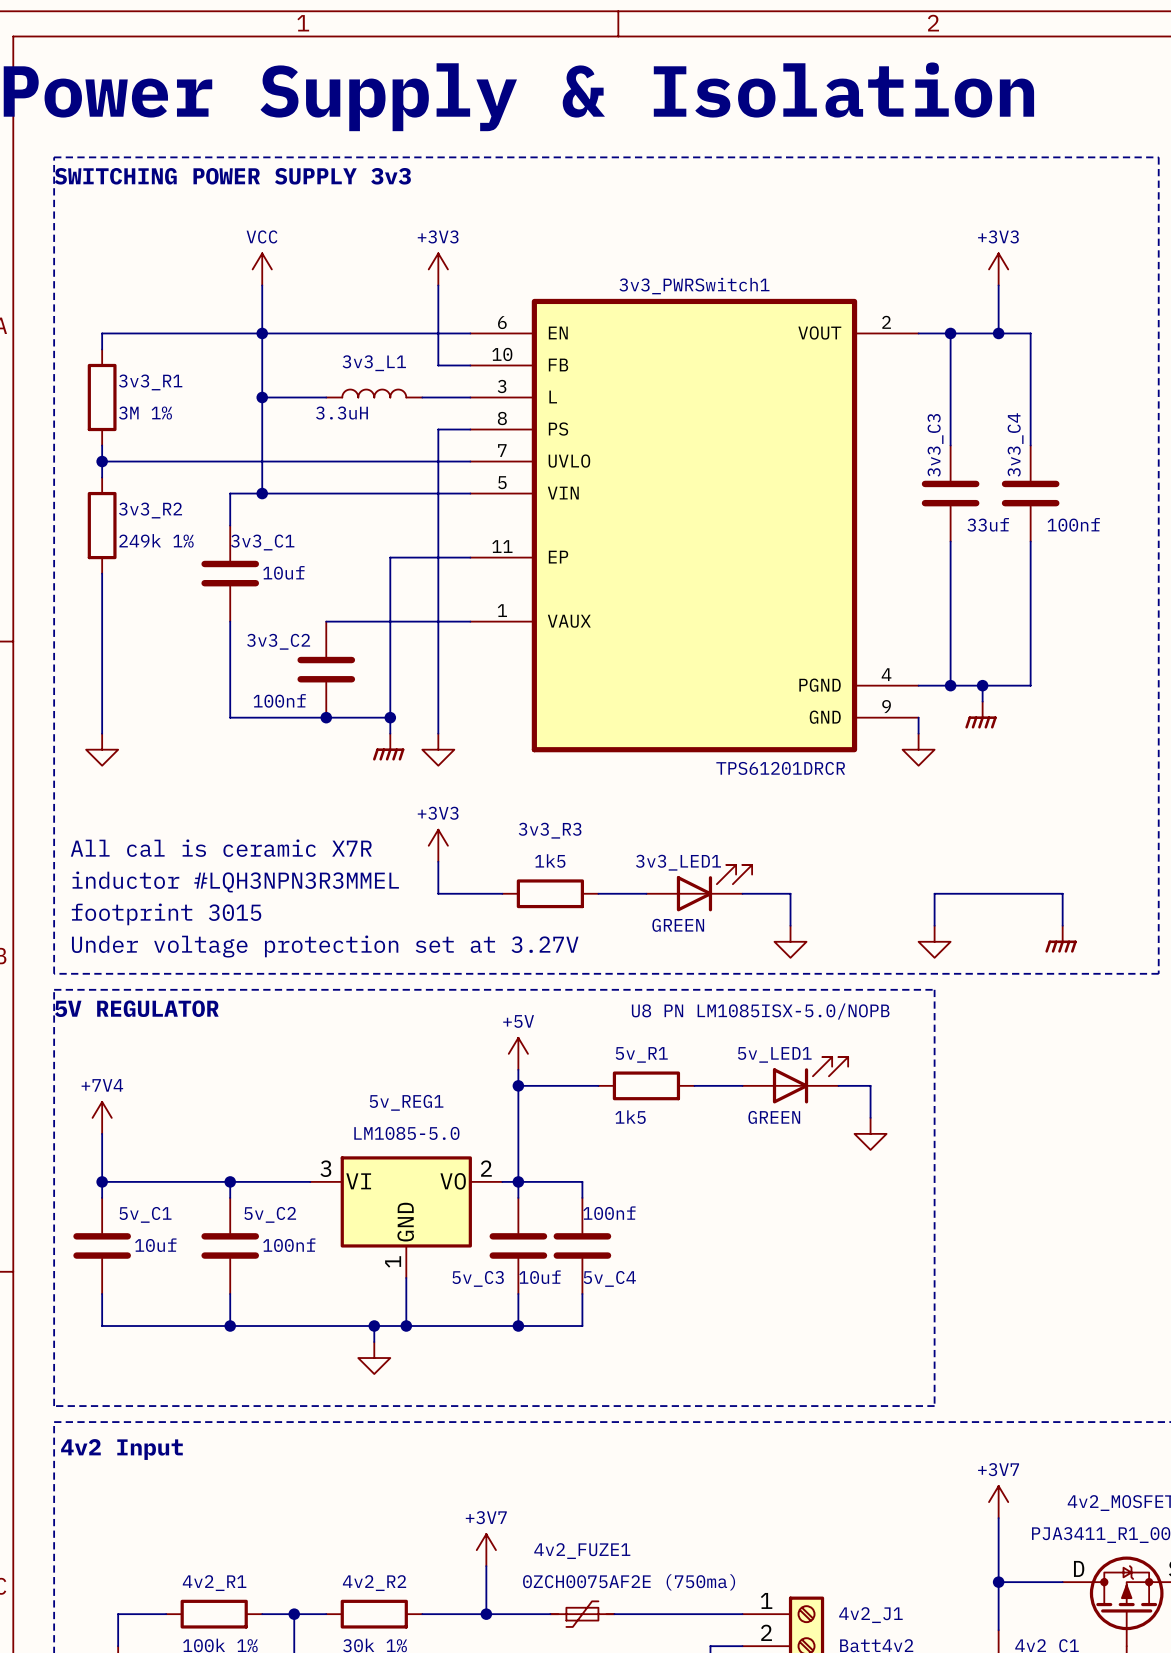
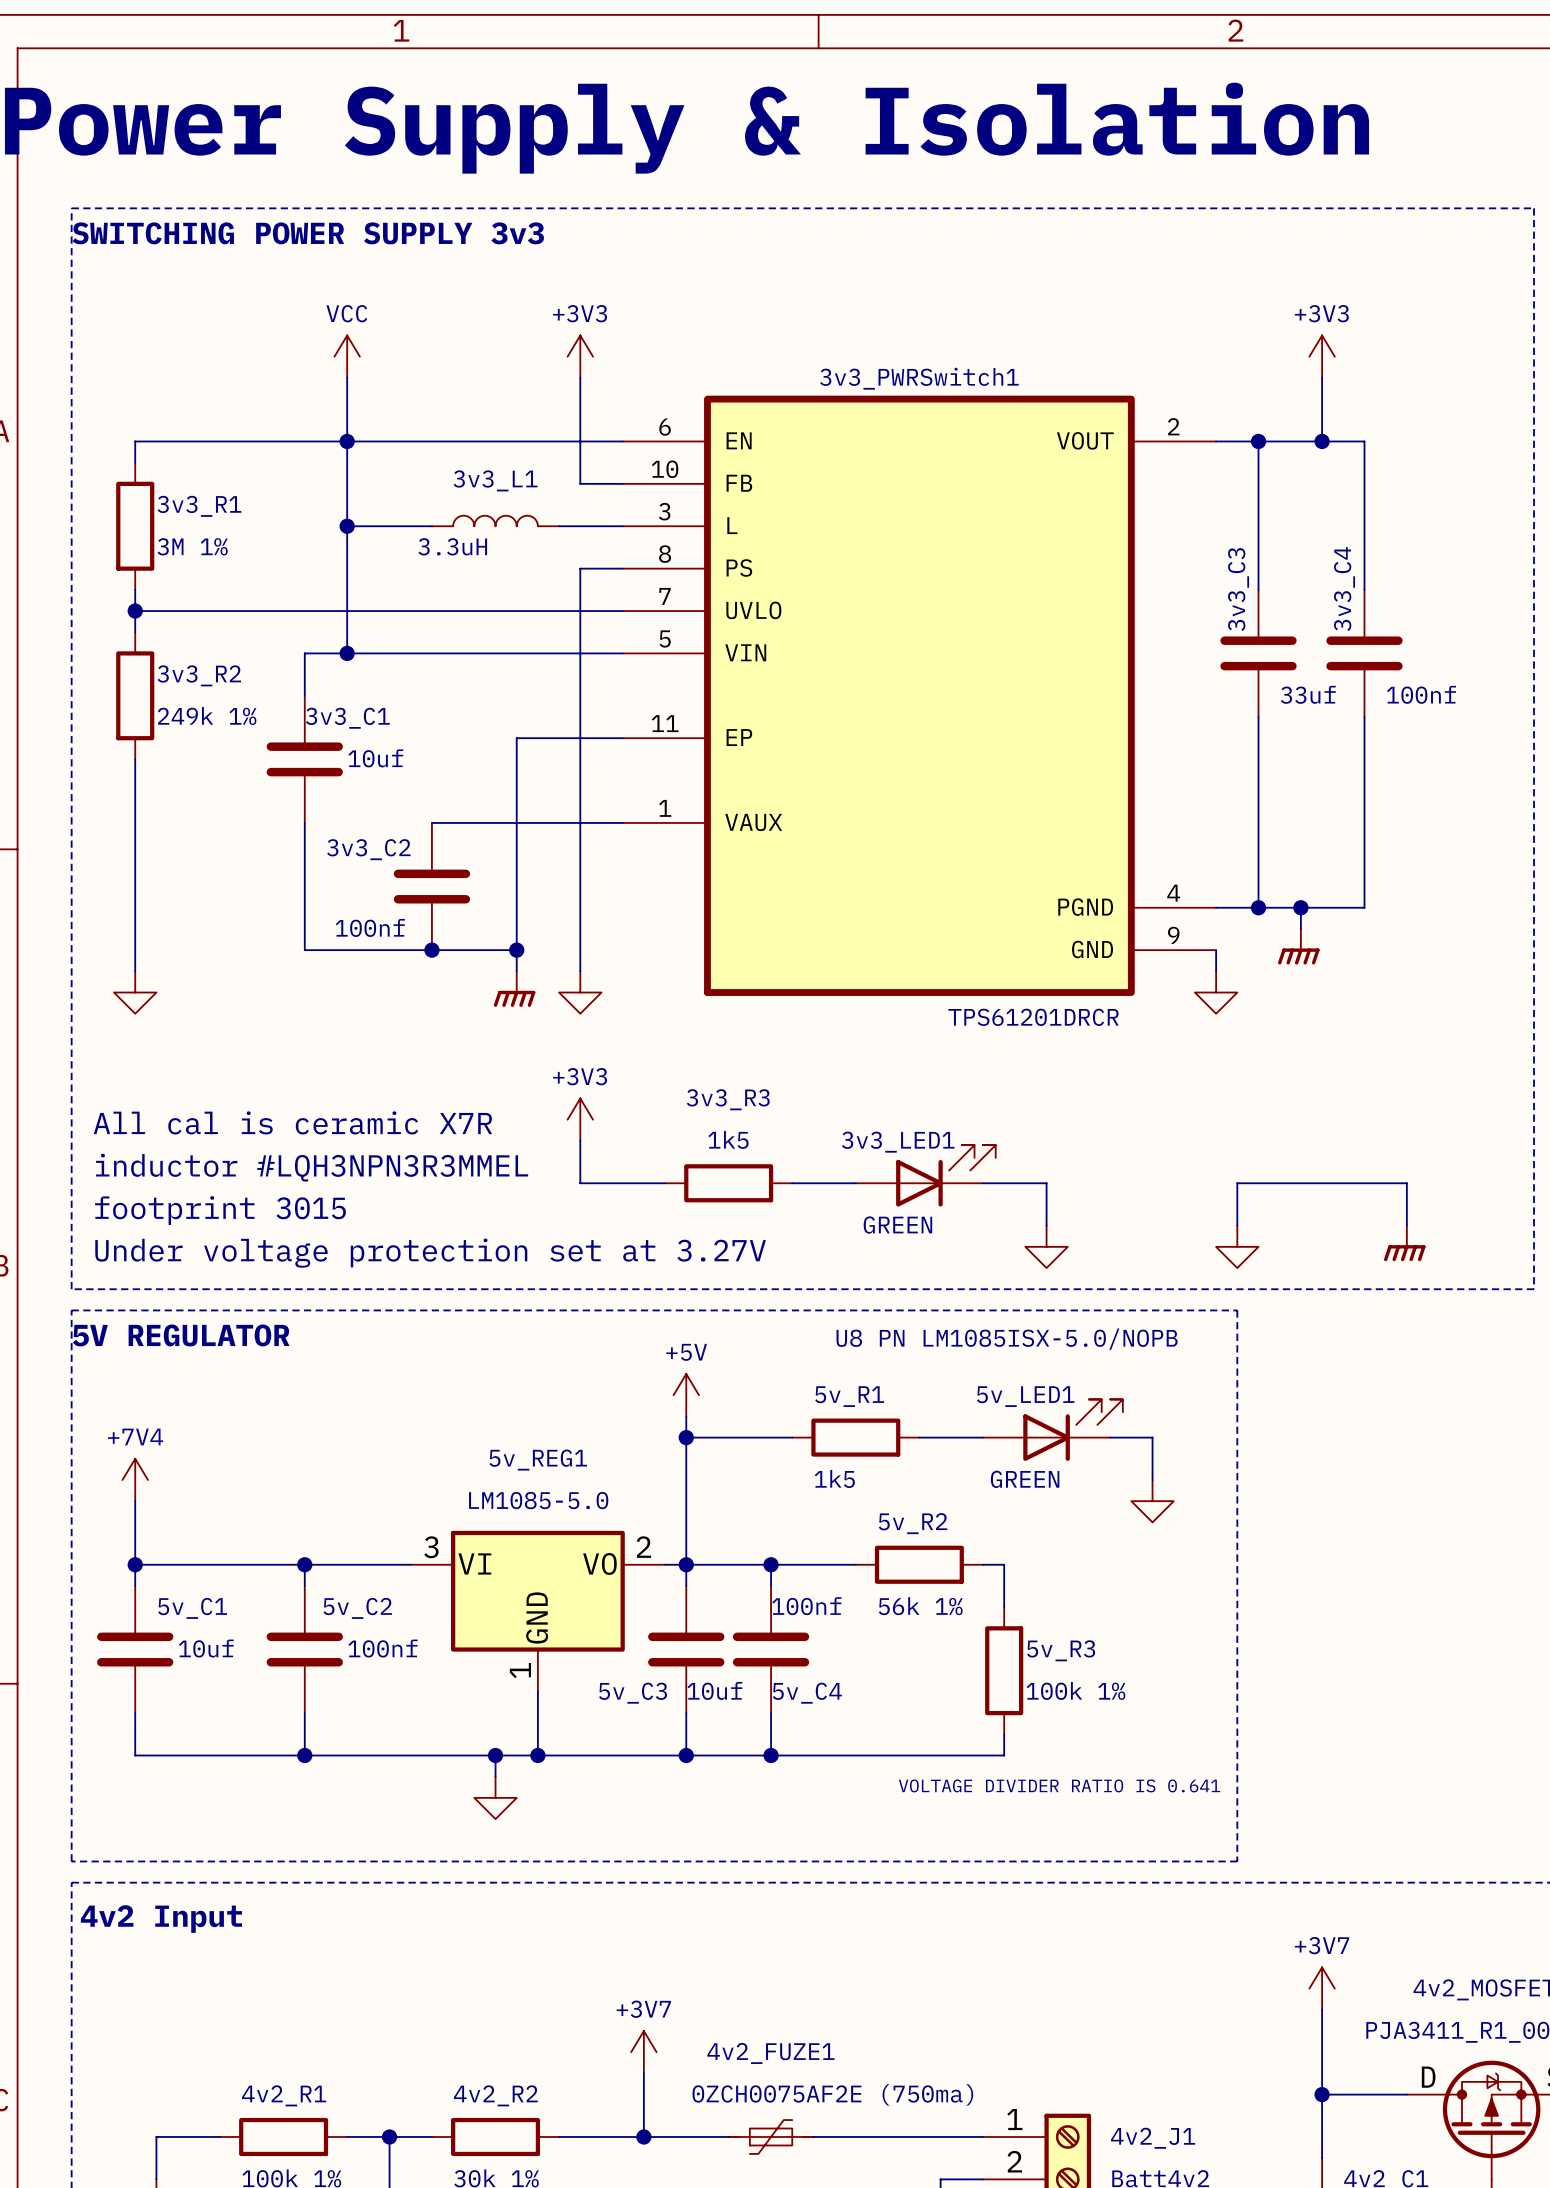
wire: none -> (771, 1564) (855, 1564)
junction: none -> (771, 1564)
5v_R2: none -> 56k 1% (919, 1564)
wire: none -> (982, 1564) (1004, 1564) (1004, 1607)
5v_R3: none -> 100k 1% (1004, 1670)
wire: none -> (1004, 1734) (1004, 1755) (771, 1755)
junction: none -> (771, 1755)
text: none -> VOLTAGE DIVIDER RATIO IS 0.641 (1059, 1785)

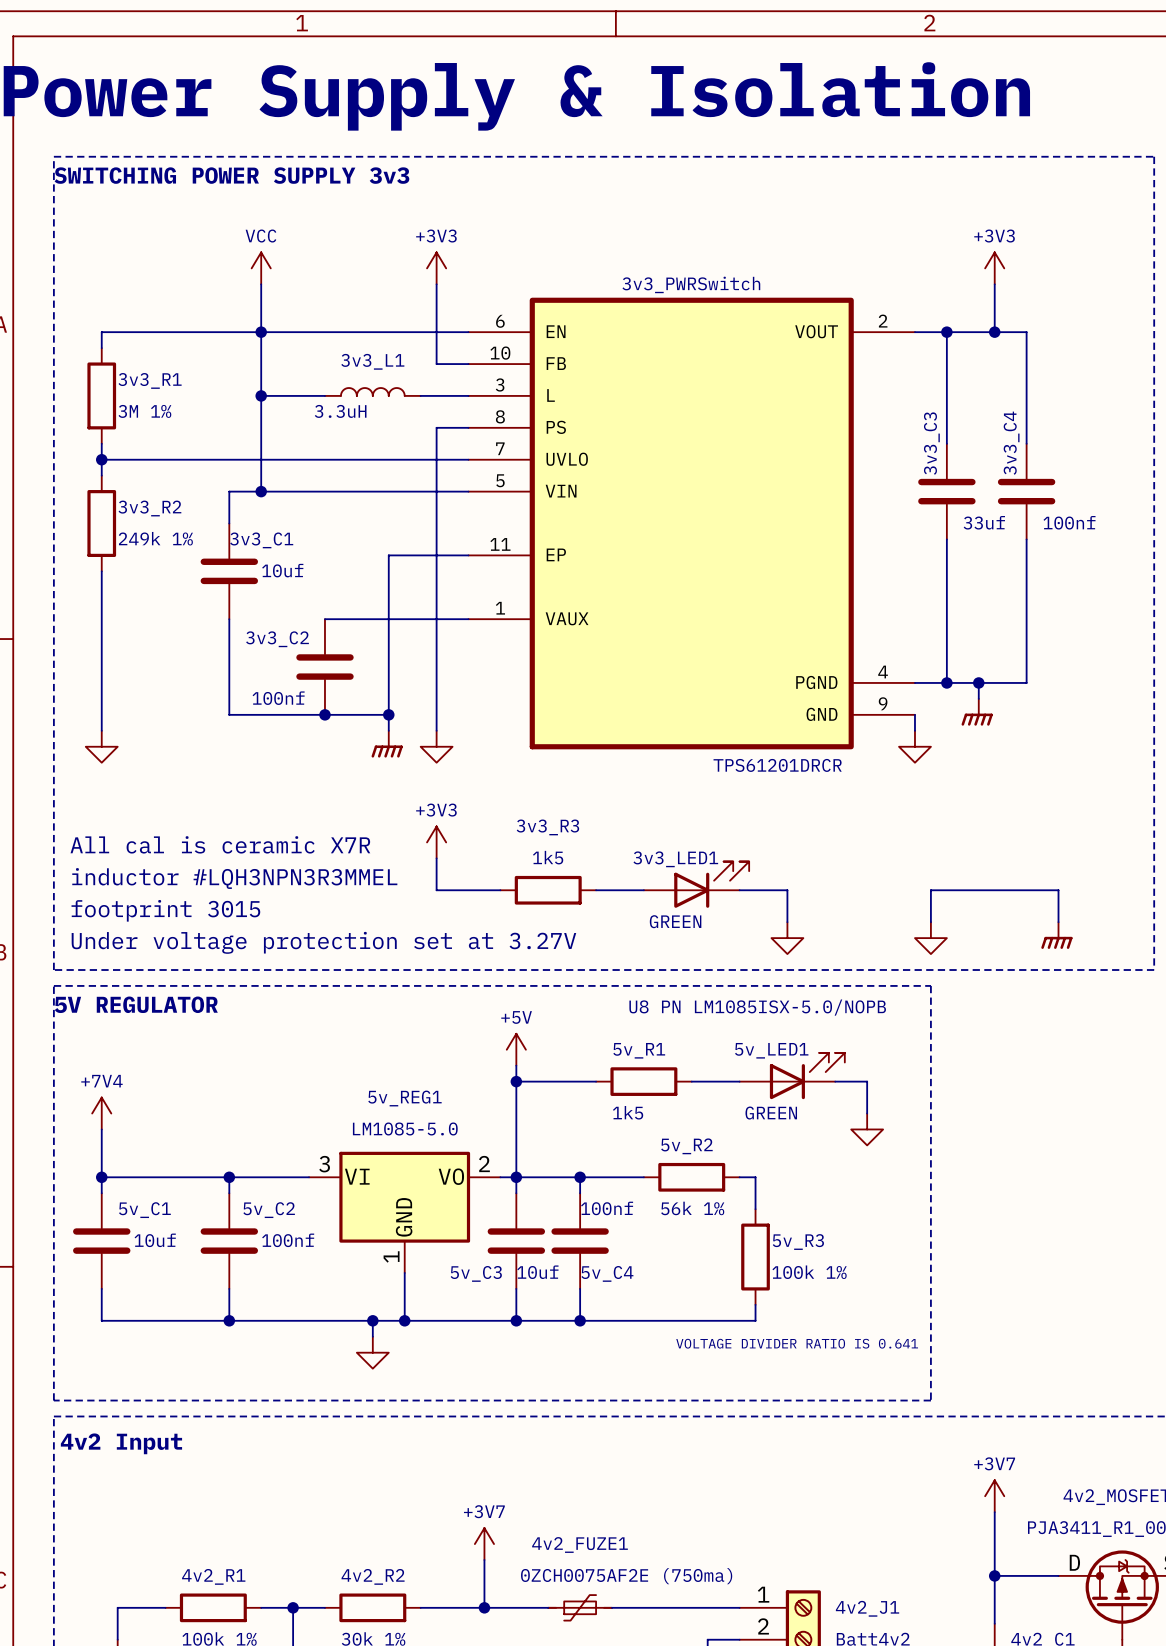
3v3_PWRSwitch1 name: 3v3_PWRSwitch1 (919, 378) -> 3v3_PWRSwitch (691, 284)

